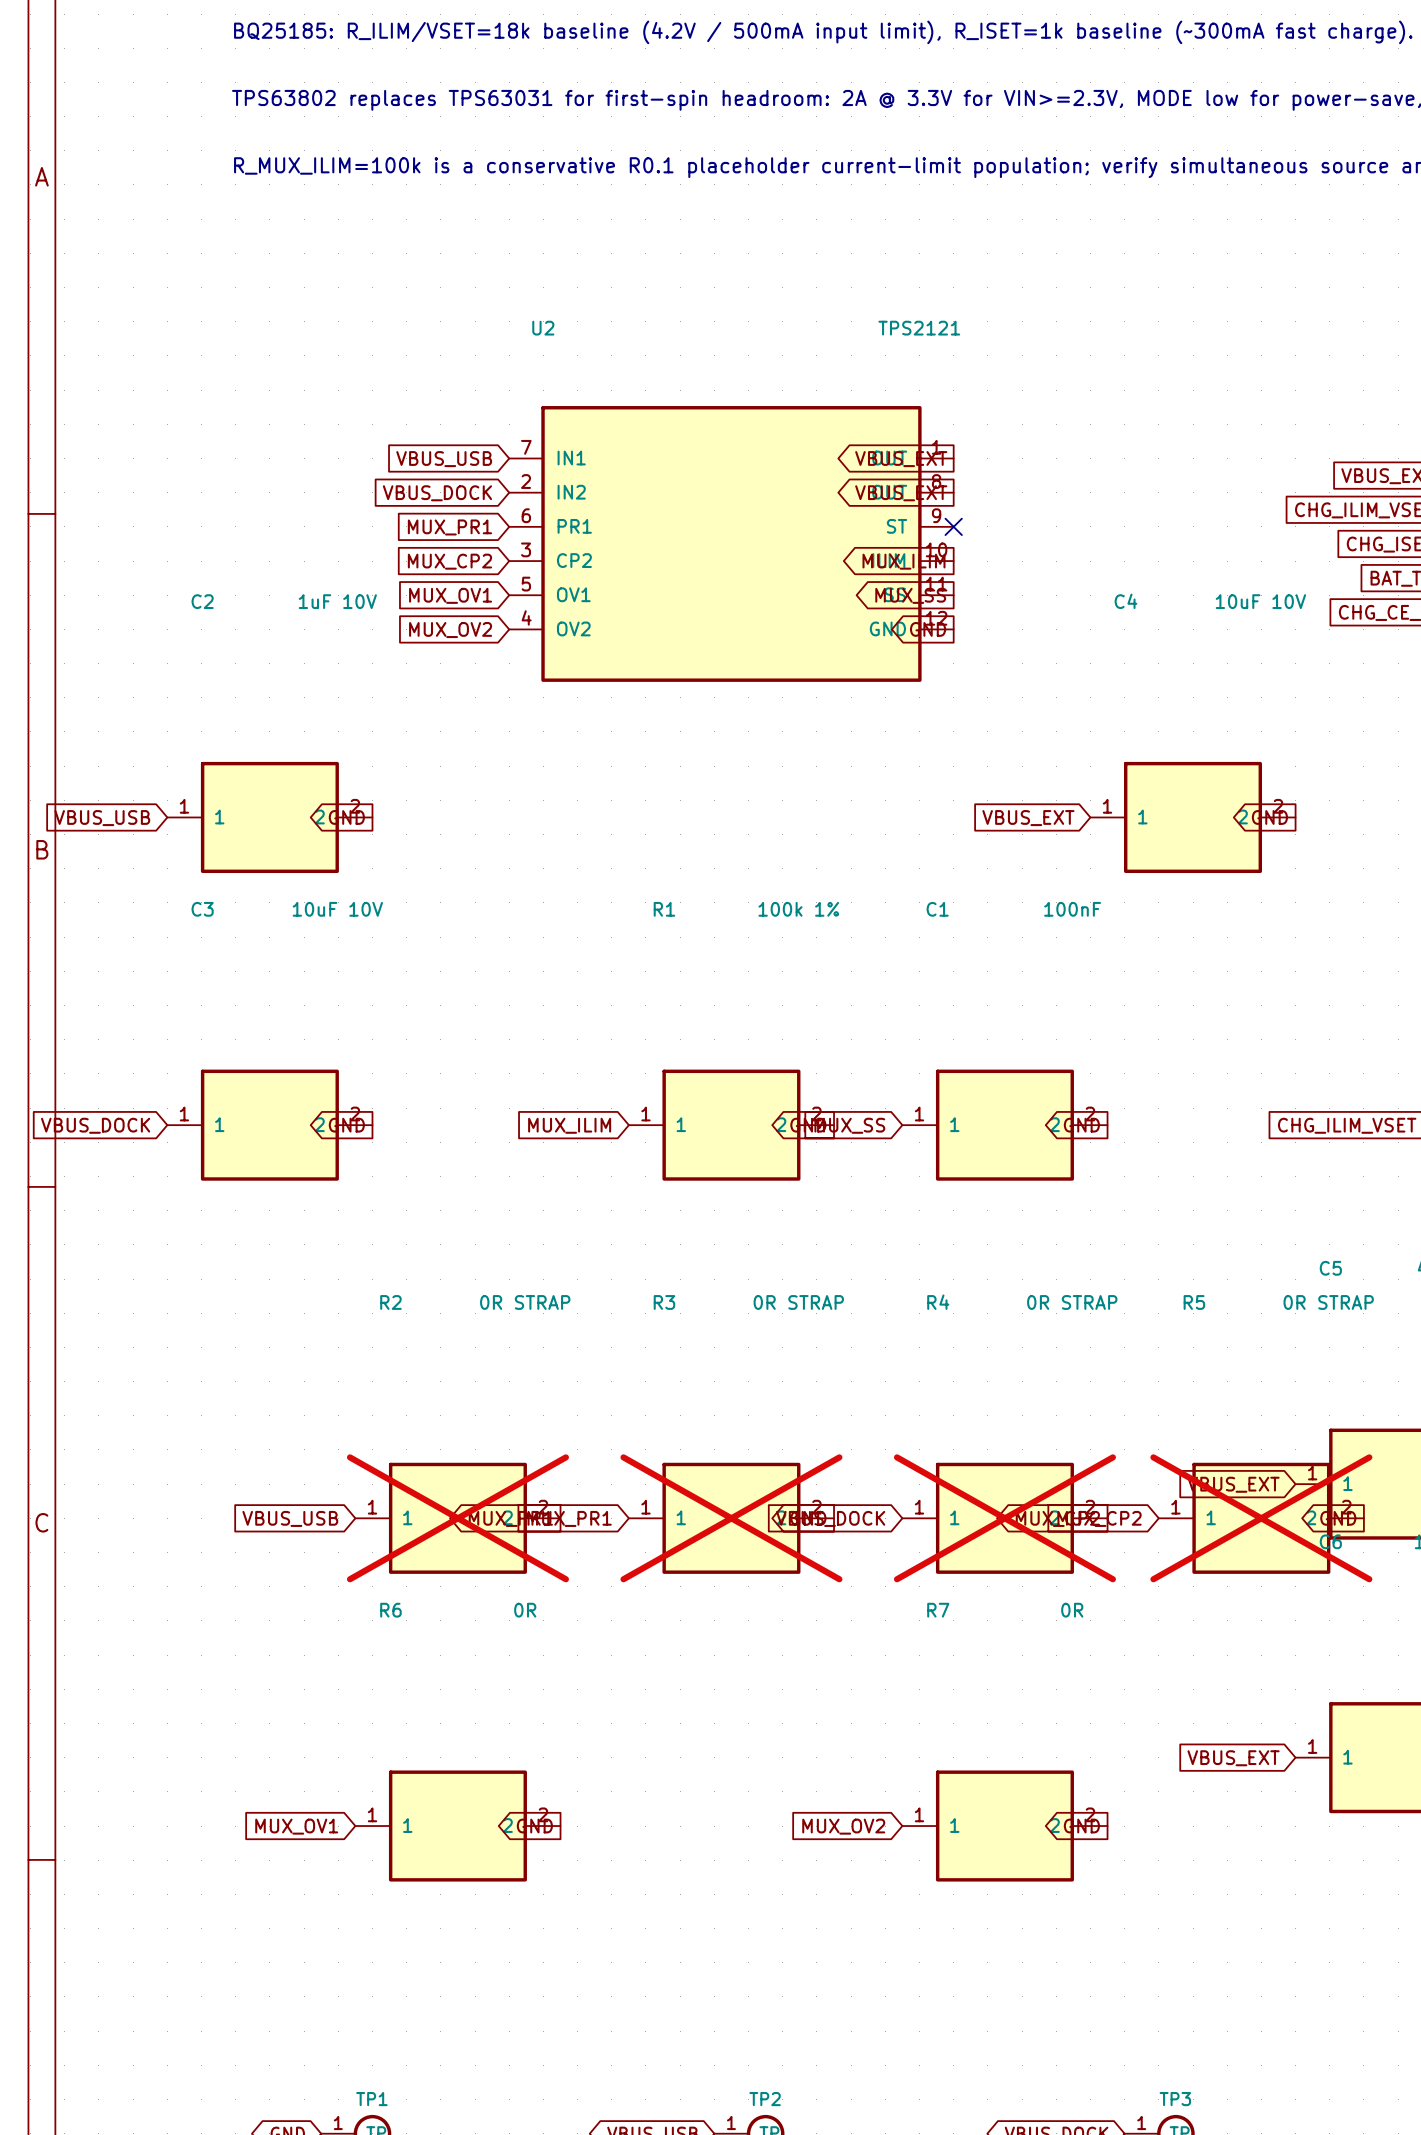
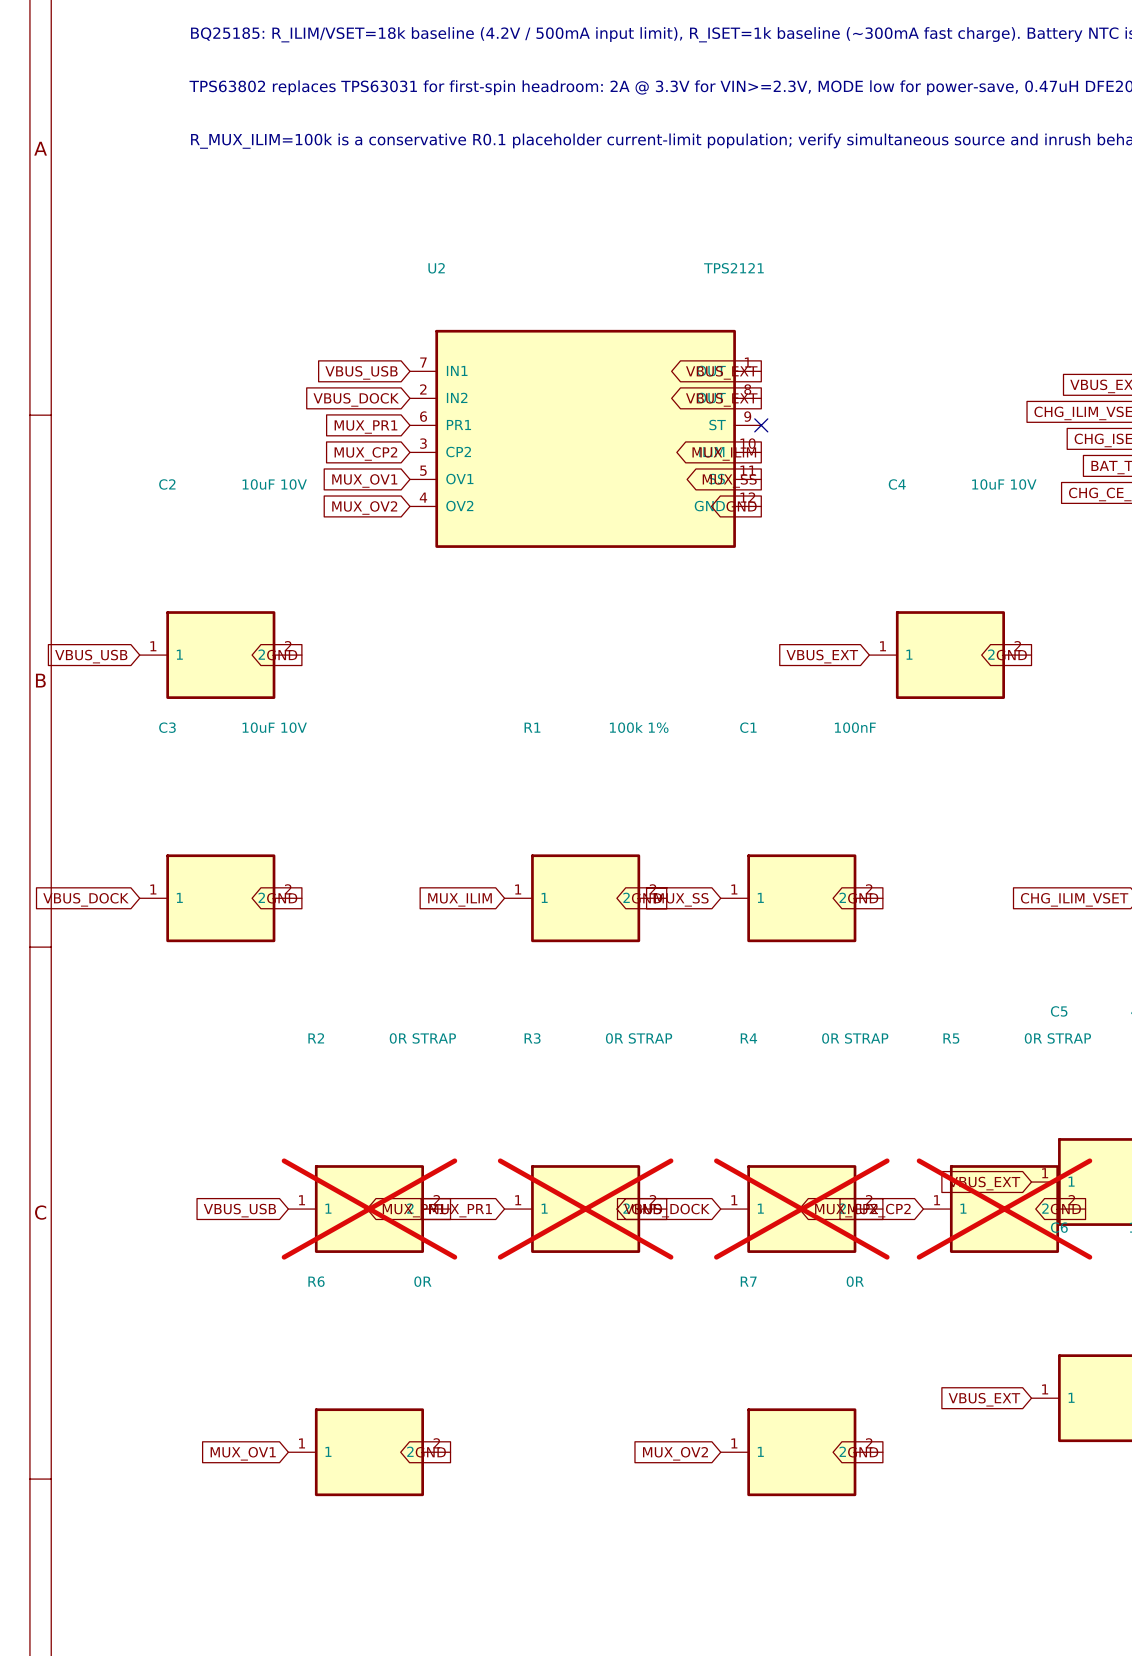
C2 value: 1uF 10V (337, 601) -> 10uF 10V (274, 484)

